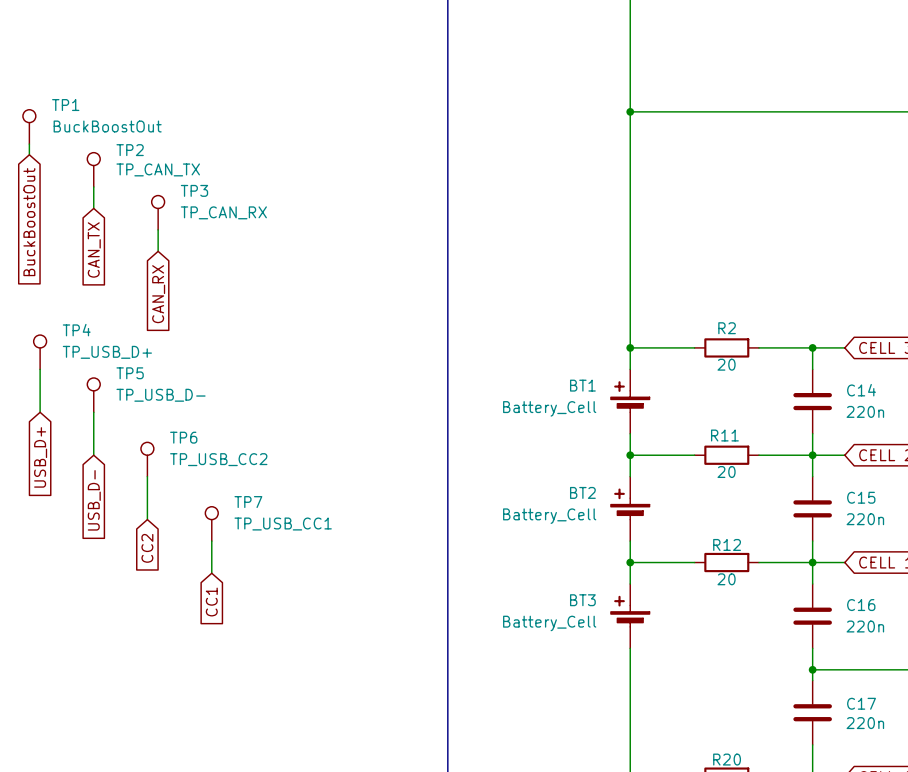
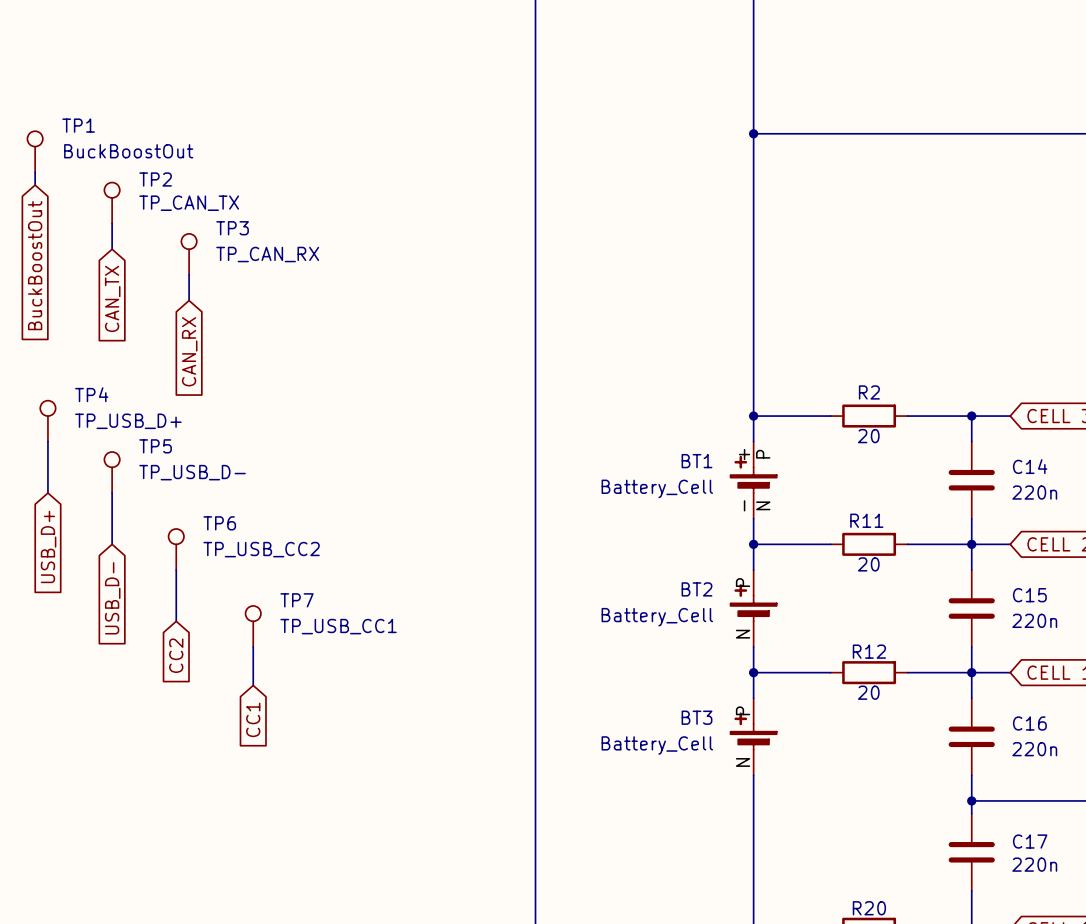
BT1 pin number: none -> P (763, 454)
BT1 pin name: none -> + (744, 454)
BT1 pin name: none -> - (744, 505)
BT1 pin number: none -> N (763, 505)
BT2 pin number: none -> P (743, 582)
BT2 pin number: none -> N (743, 634)
BT3 pin number: none -> P (743, 710)
BT3 pin number: none -> N (743, 762)

